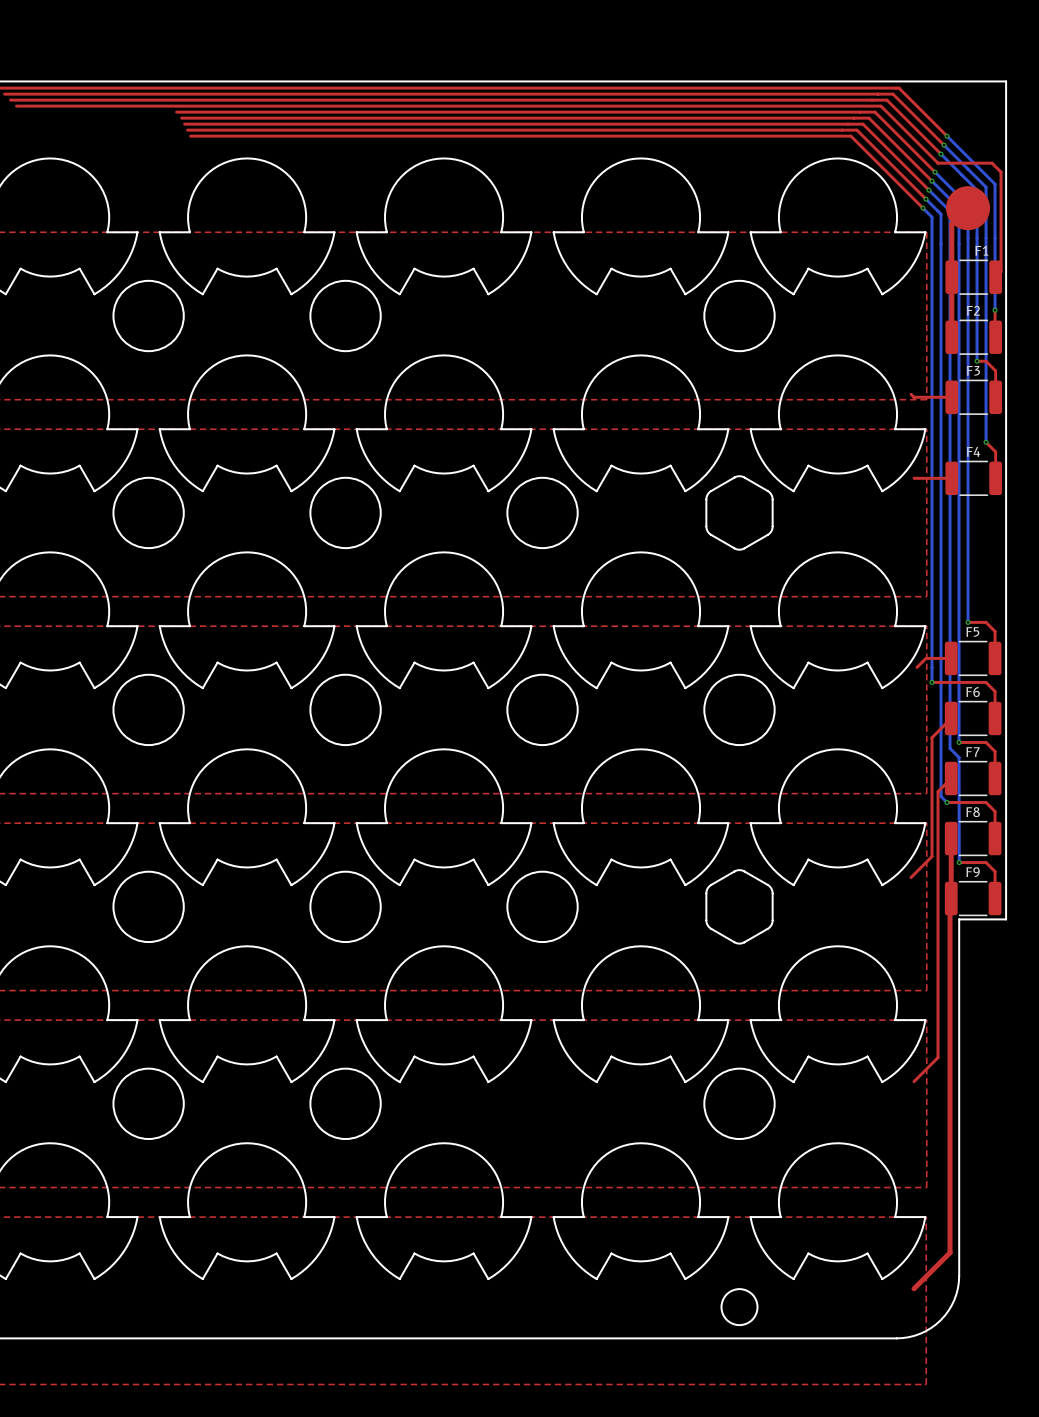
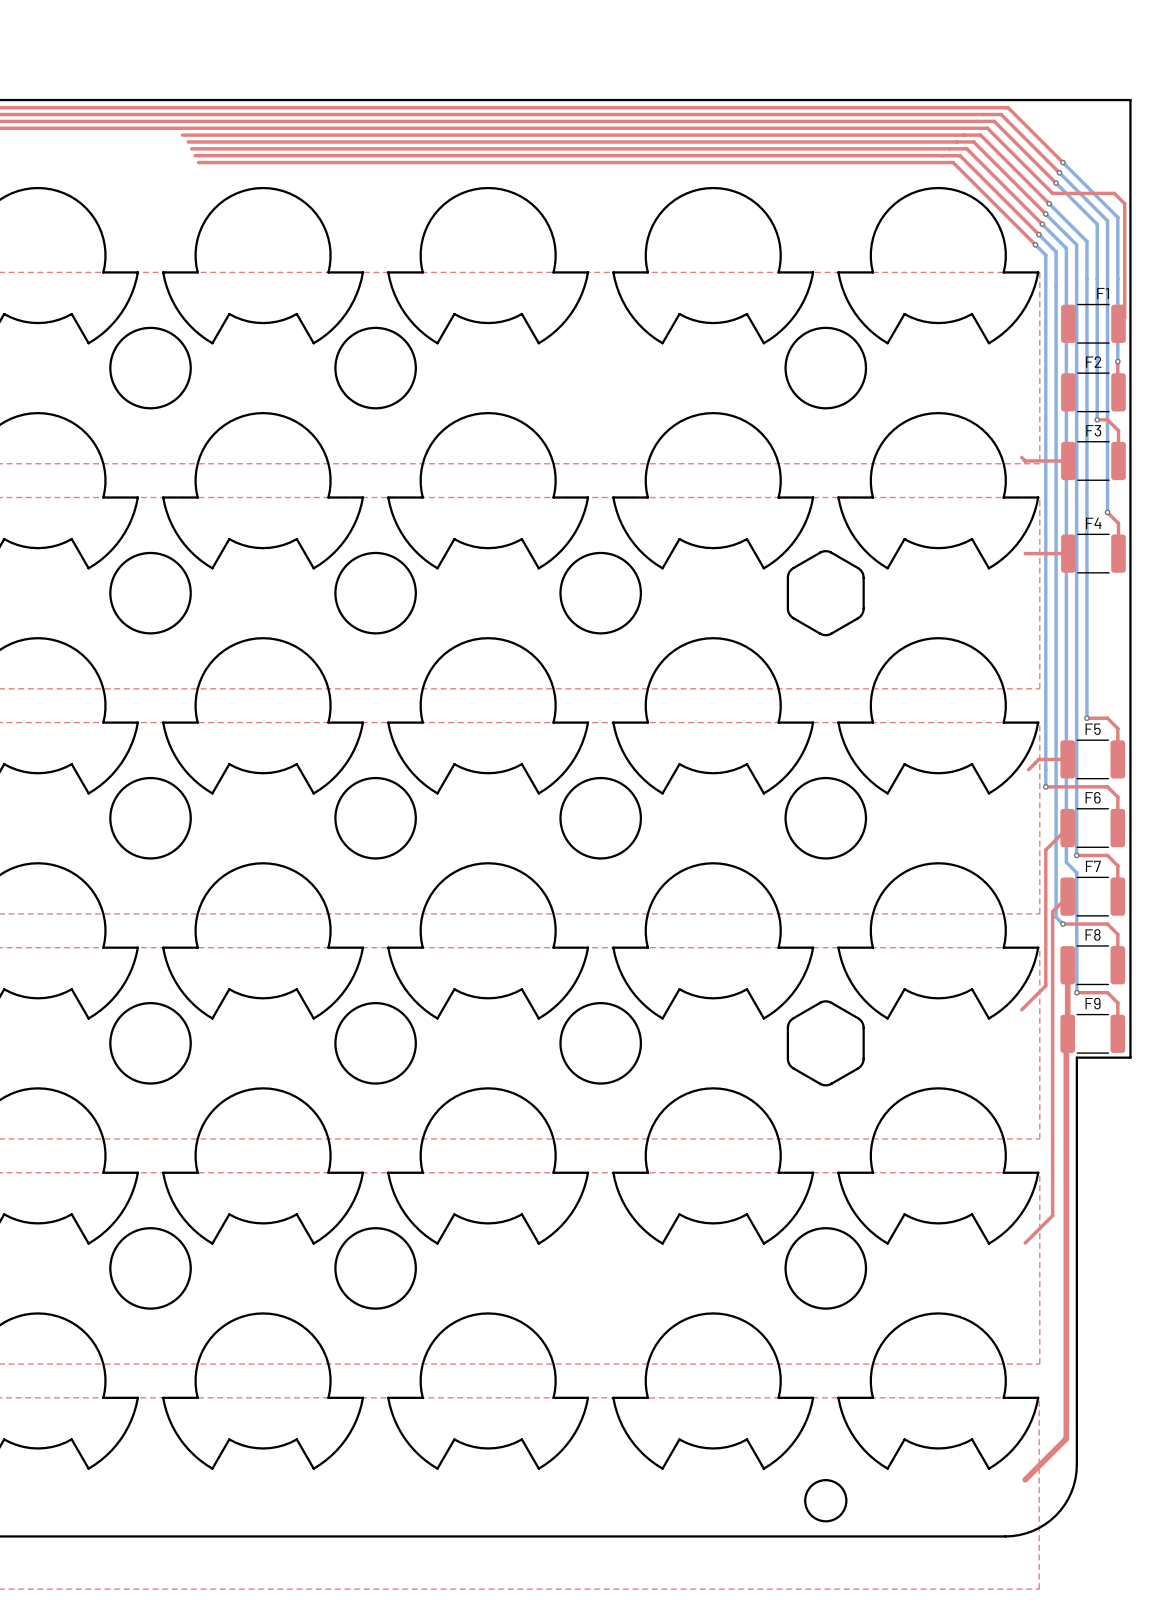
drawing: [946, 186, 991, 231] -> none
top track: (968, 208) (951, 224) (951, 337) -> none

